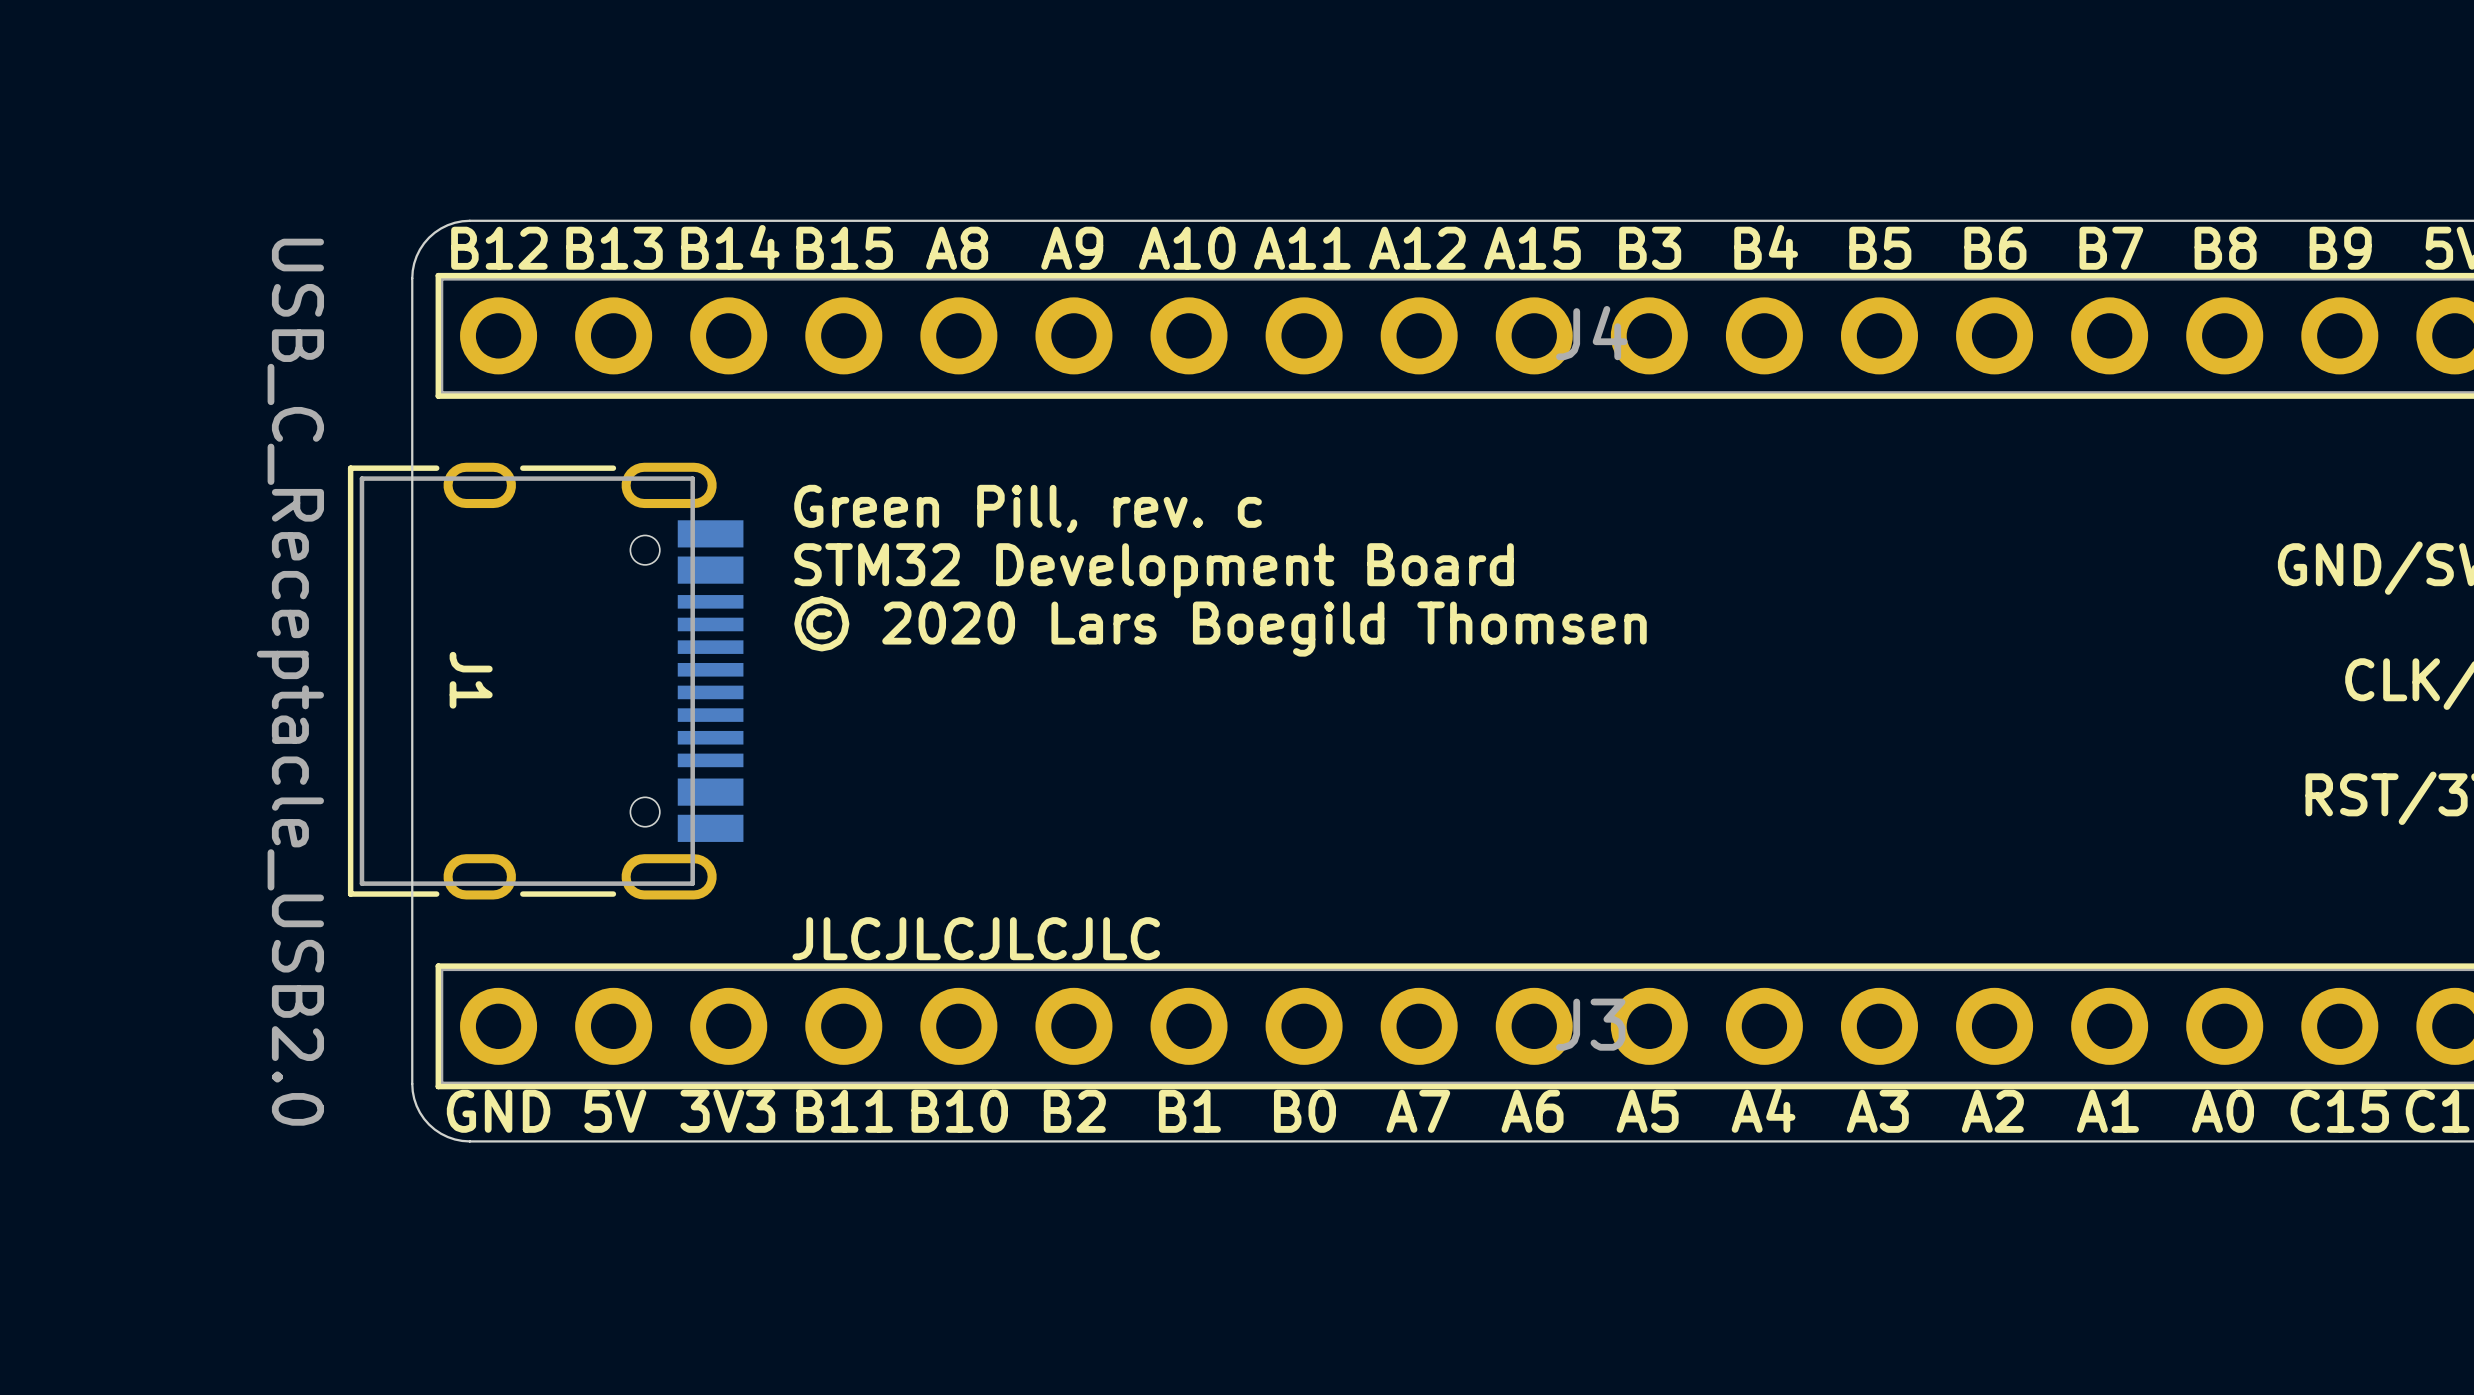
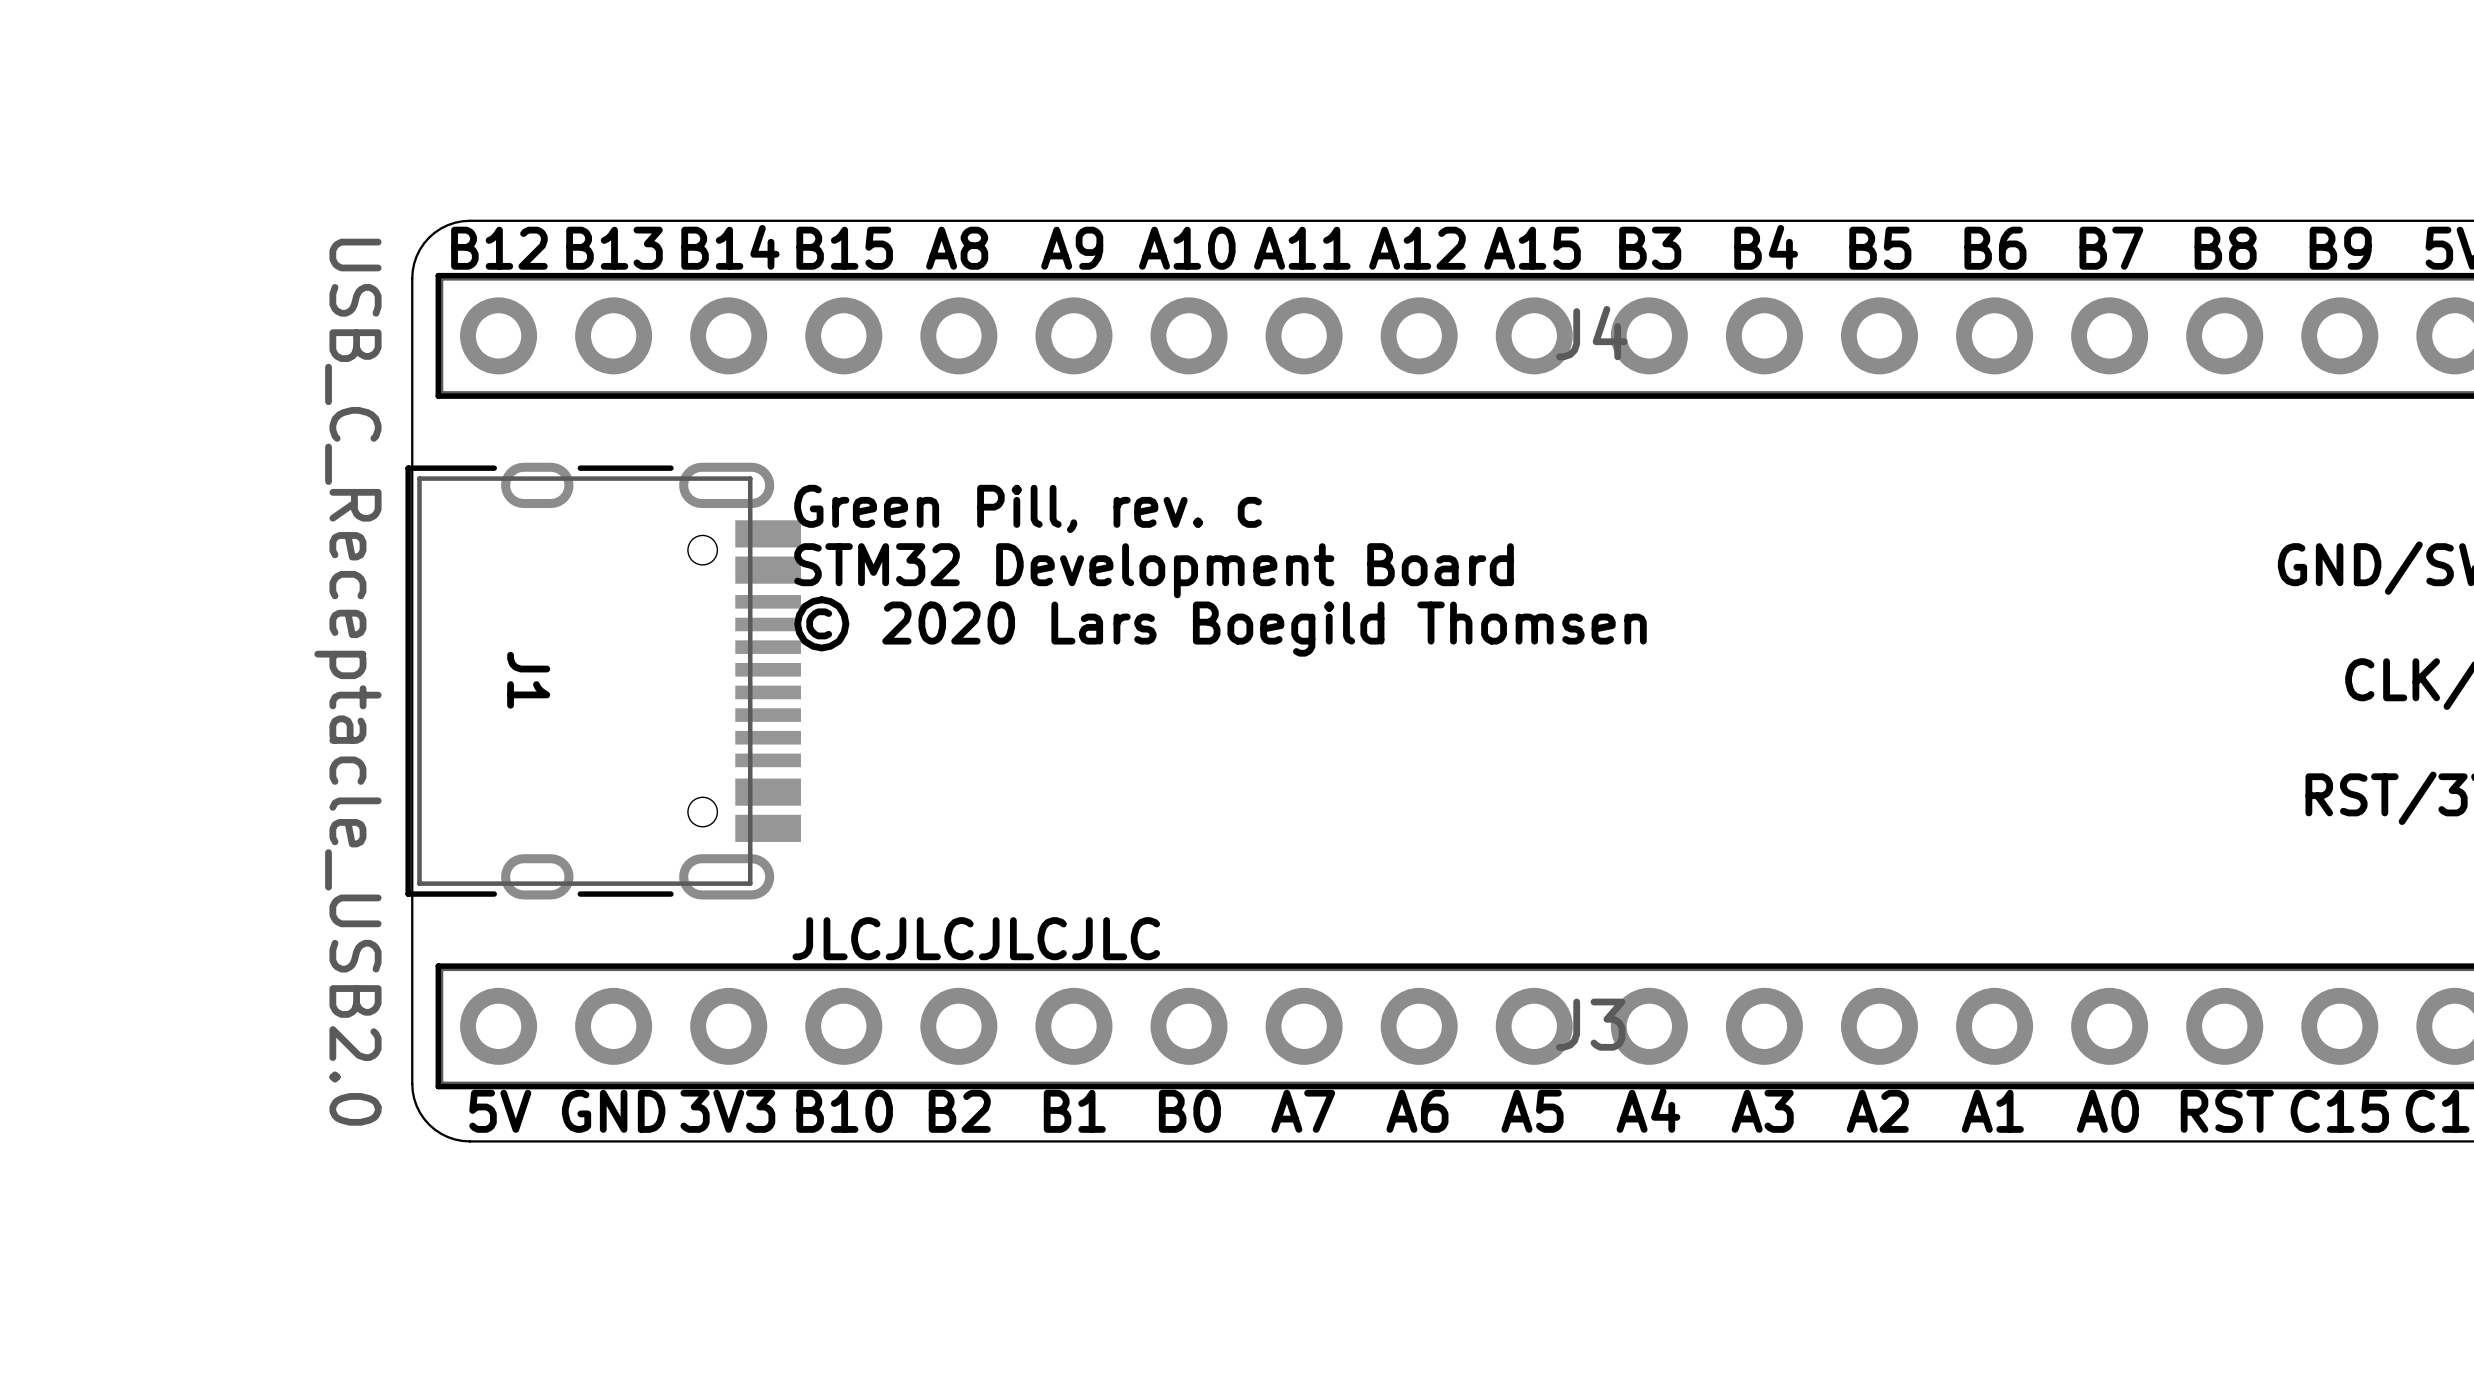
J1 position: (545, 681) -> (603, 681)
text: A4 (1763, 1110) -> A3 (1762, 1111)
text: GND (498, 1111) -> 5V (500, 1111)
text: 5V (615, 1111) -> GND (613, 1111)
text: B11 (844, 1111) -> B10 (844, 1111)
text: B10 (959, 1111) -> B2 (959, 1111)
text: B2 (1074, 1111) -> B1 (1074, 1111)
text: B1 (1189, 1111) -> B0 (1189, 1111)
text: B0 (1304, 1111) -> A7 (1303, 1111)
text: A7 (1418, 1111) -> A6 (1417, 1111)
text: A6 (1532, 1111) -> A5 (1532, 1111)
text: A5 (1647, 1111) -> A4 (1648, 1110)
text: A3 (1877, 1111) -> A2 (1877, 1111)
text: A2 (1992, 1111) -> A1 (1992, 1111)
text: A1 (2107, 1111) -> A0 (2107, 1111)
text: A0 (2223, 1111) -> RST (2227, 1111)

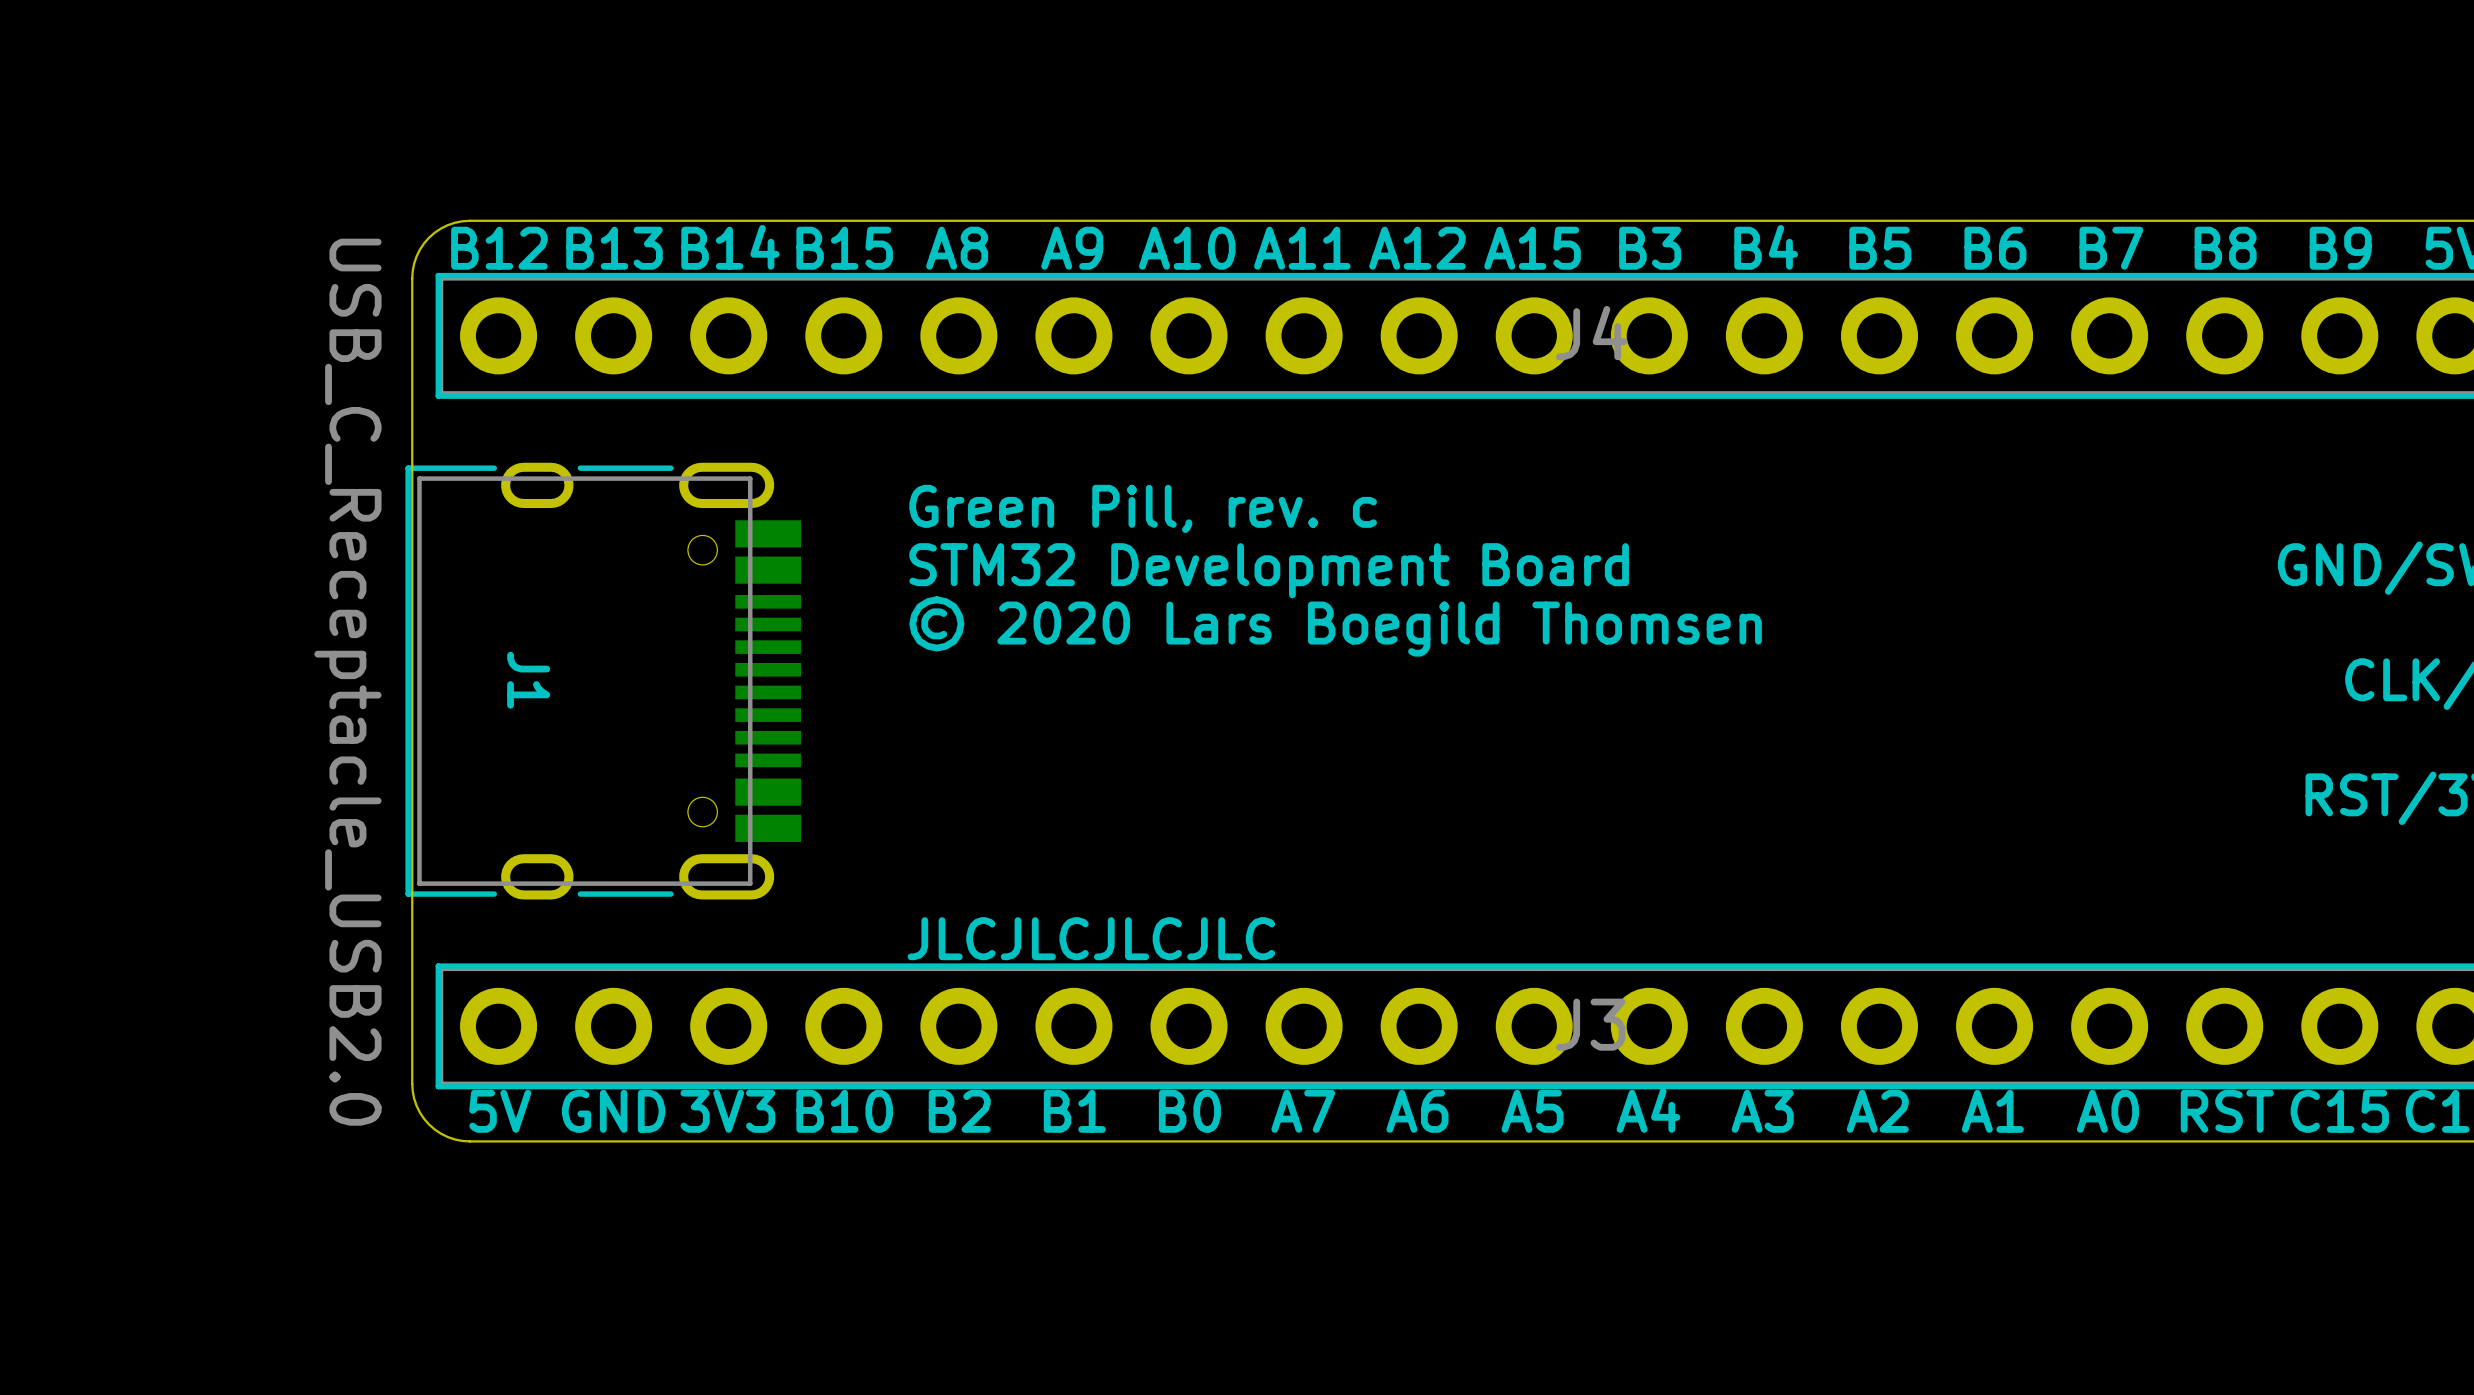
text position: Green Pill, rev. c (1028, 508) -> Green Pill, rev. c (1143, 508)
text position: STM32 Development Board (1154, 570) -> STM32 Development Board (1269, 570)
text position: © 2020 Lars Boegild Thomsen (1220, 626) -> © 2020 Lars Boegild Thomsen (1335, 626)
text position: JLCJLCJLCJLC (976, 938) -> JLCJLCJLCJLC (1091, 938)

